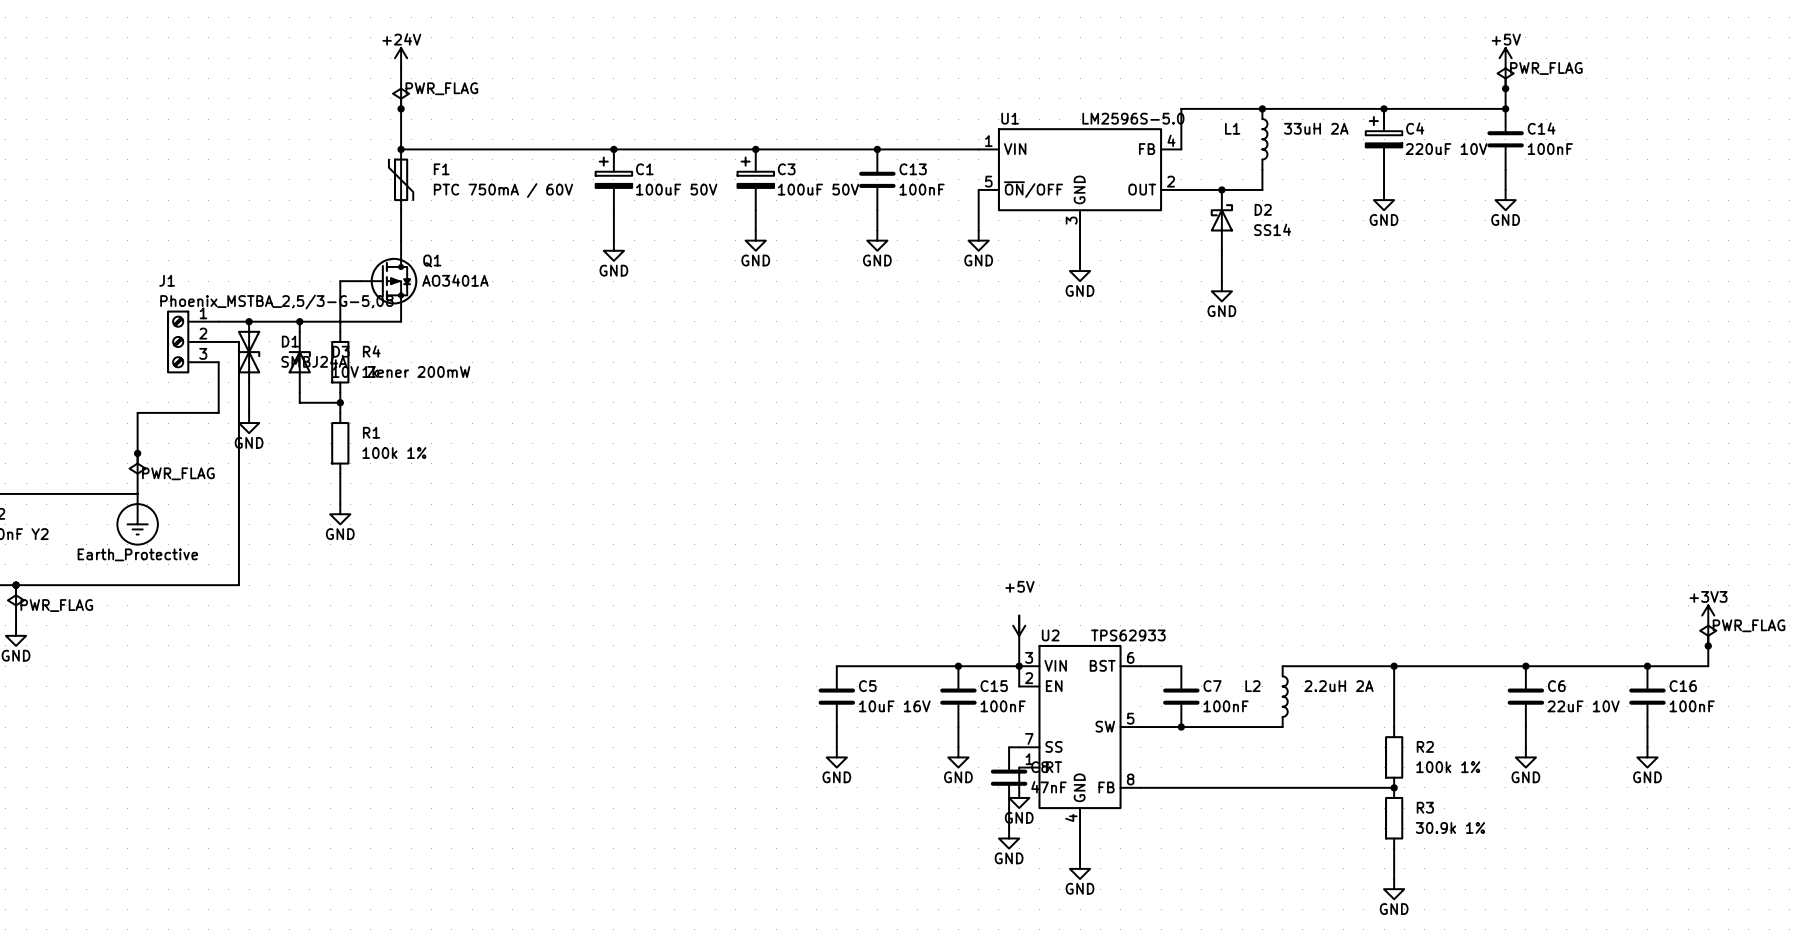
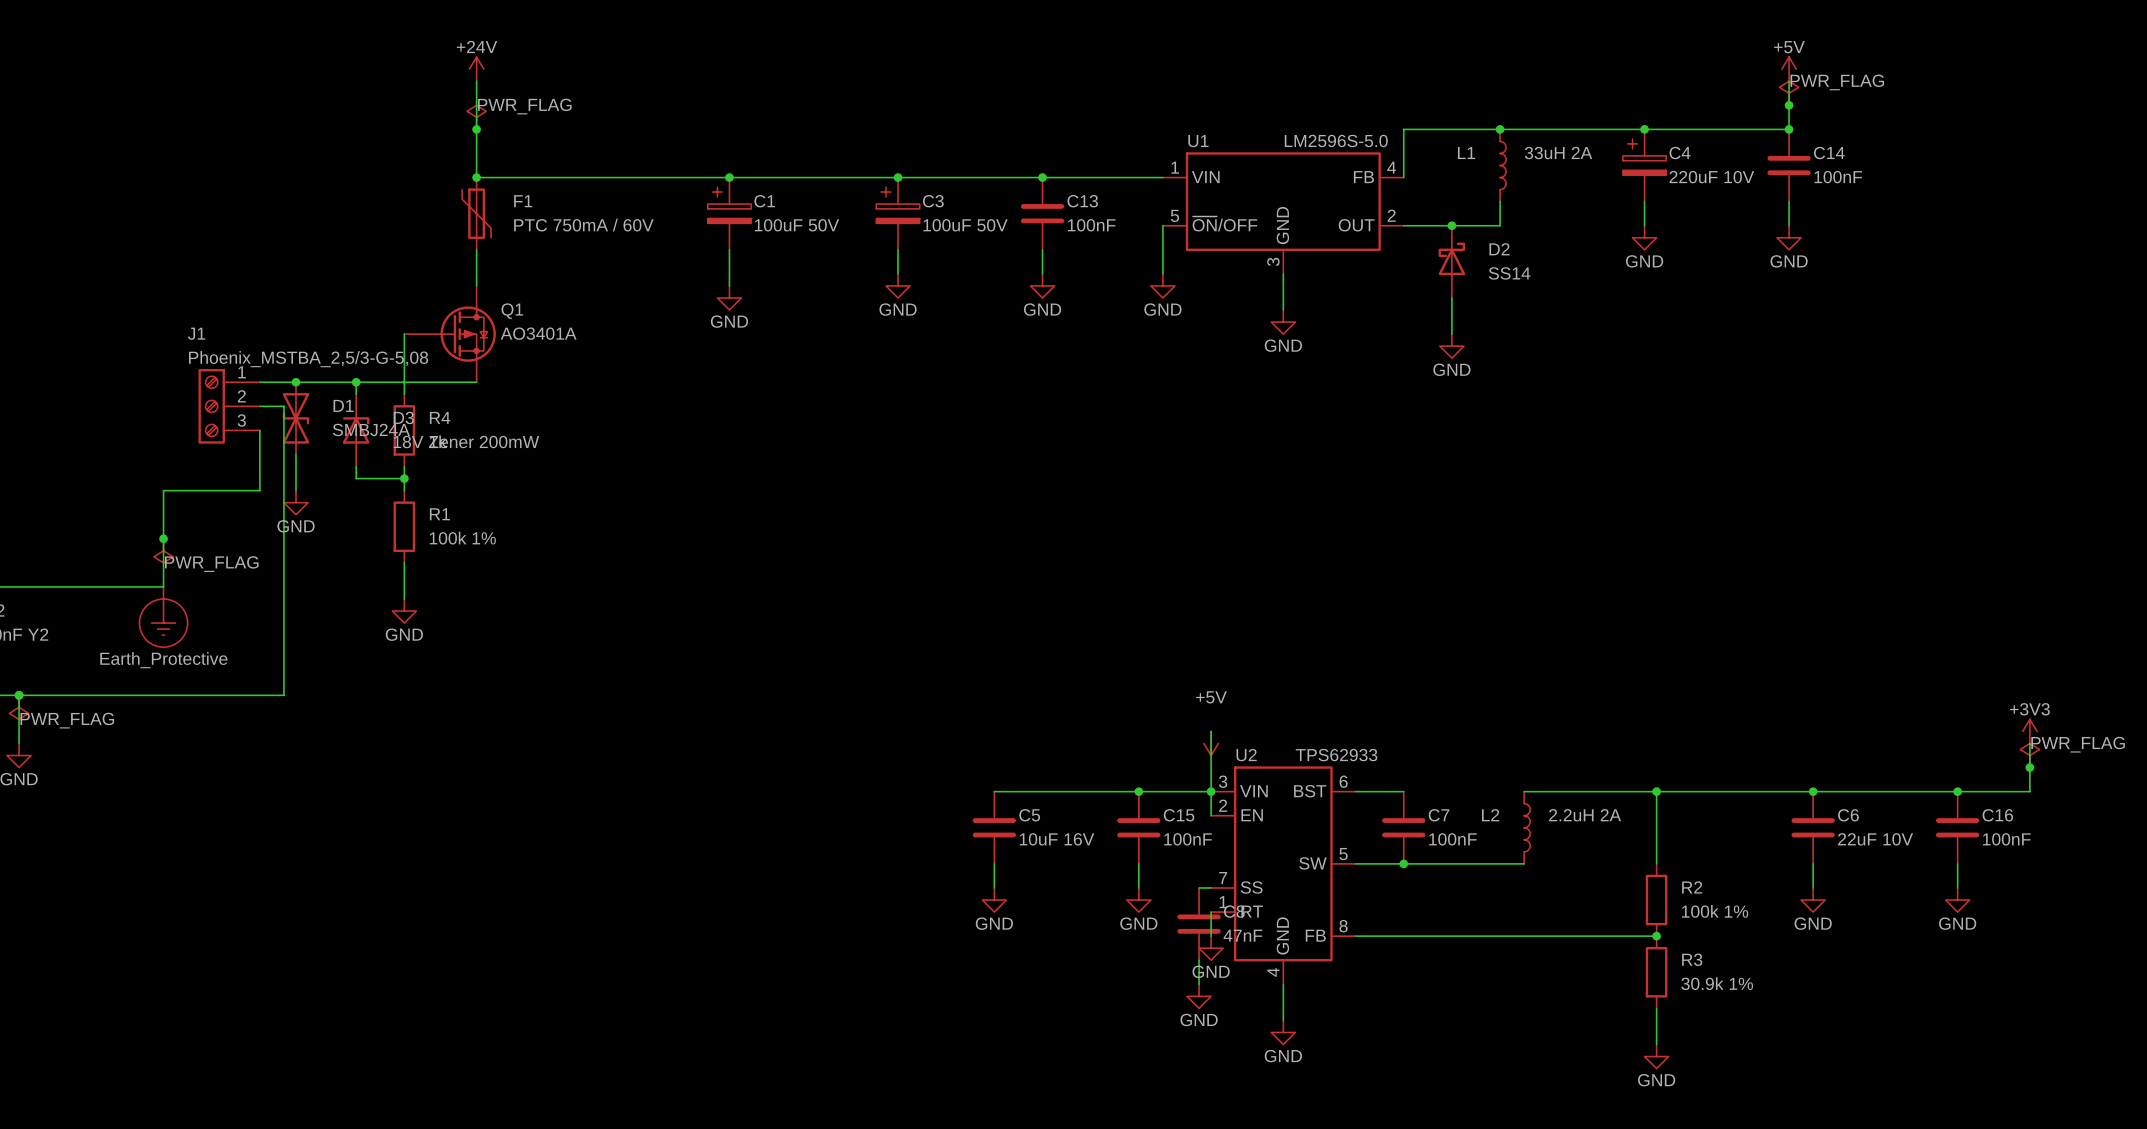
D3 value: 10V Zener 200mW (401, 371) -> 18V Zener 200mW (466, 442)

